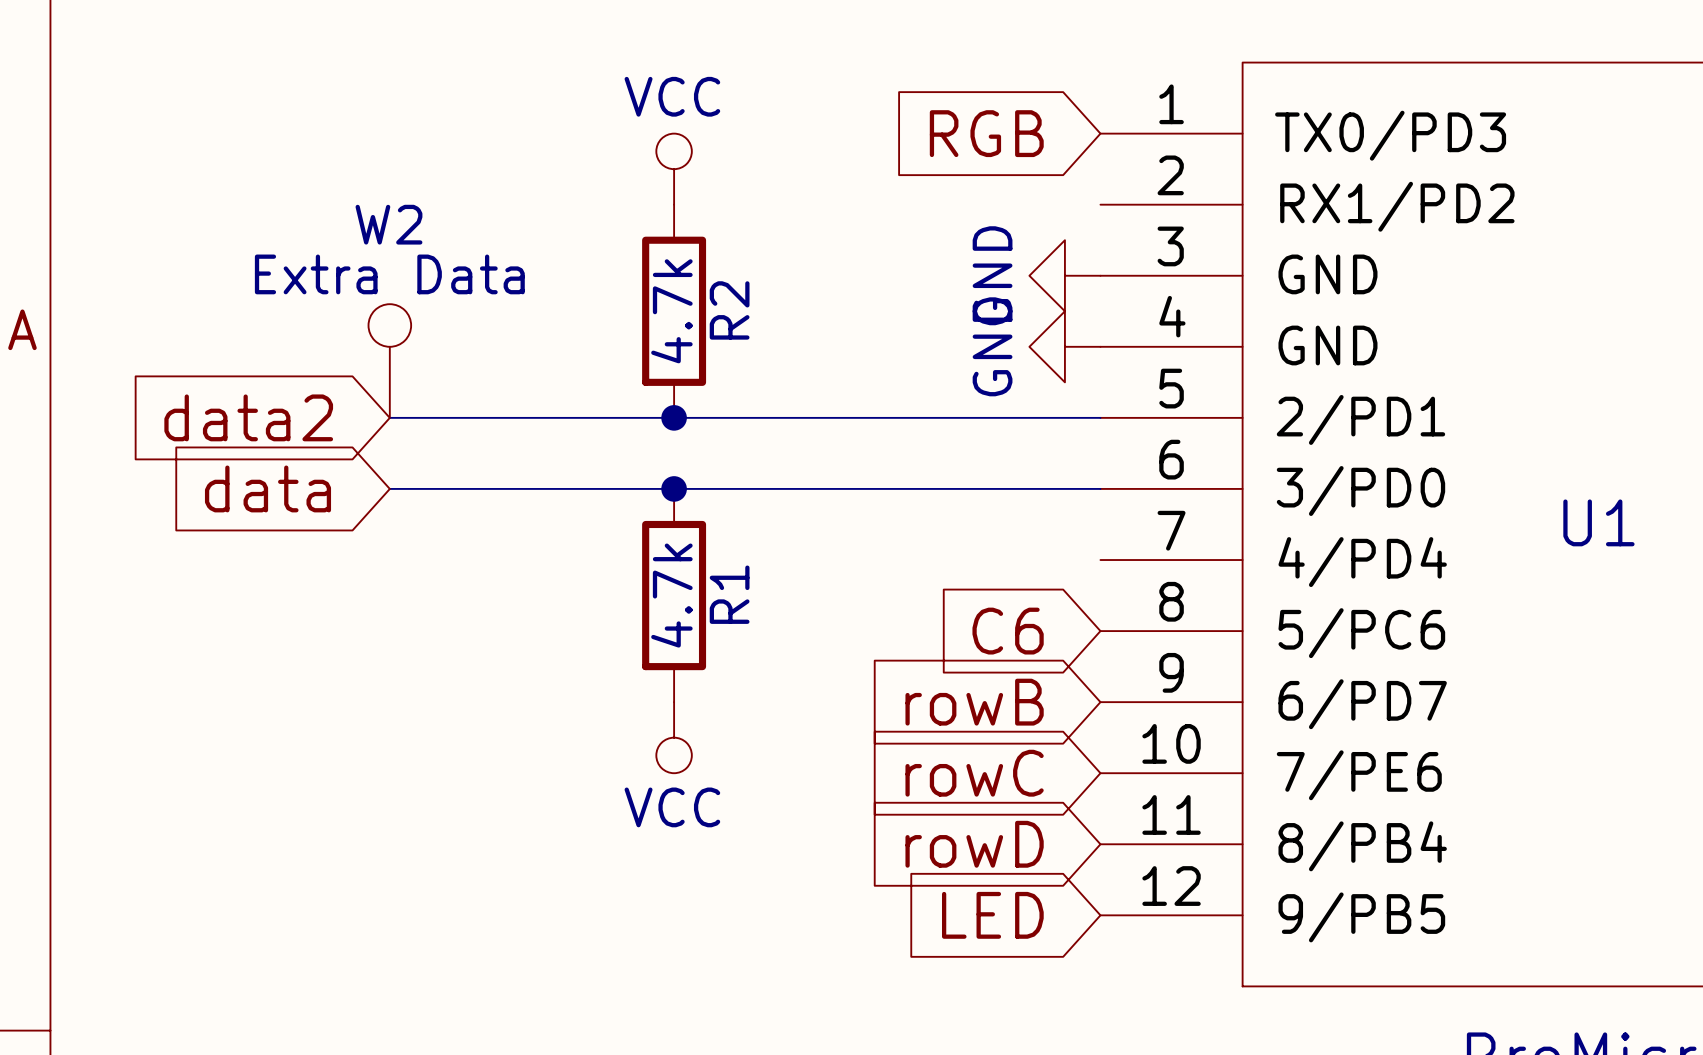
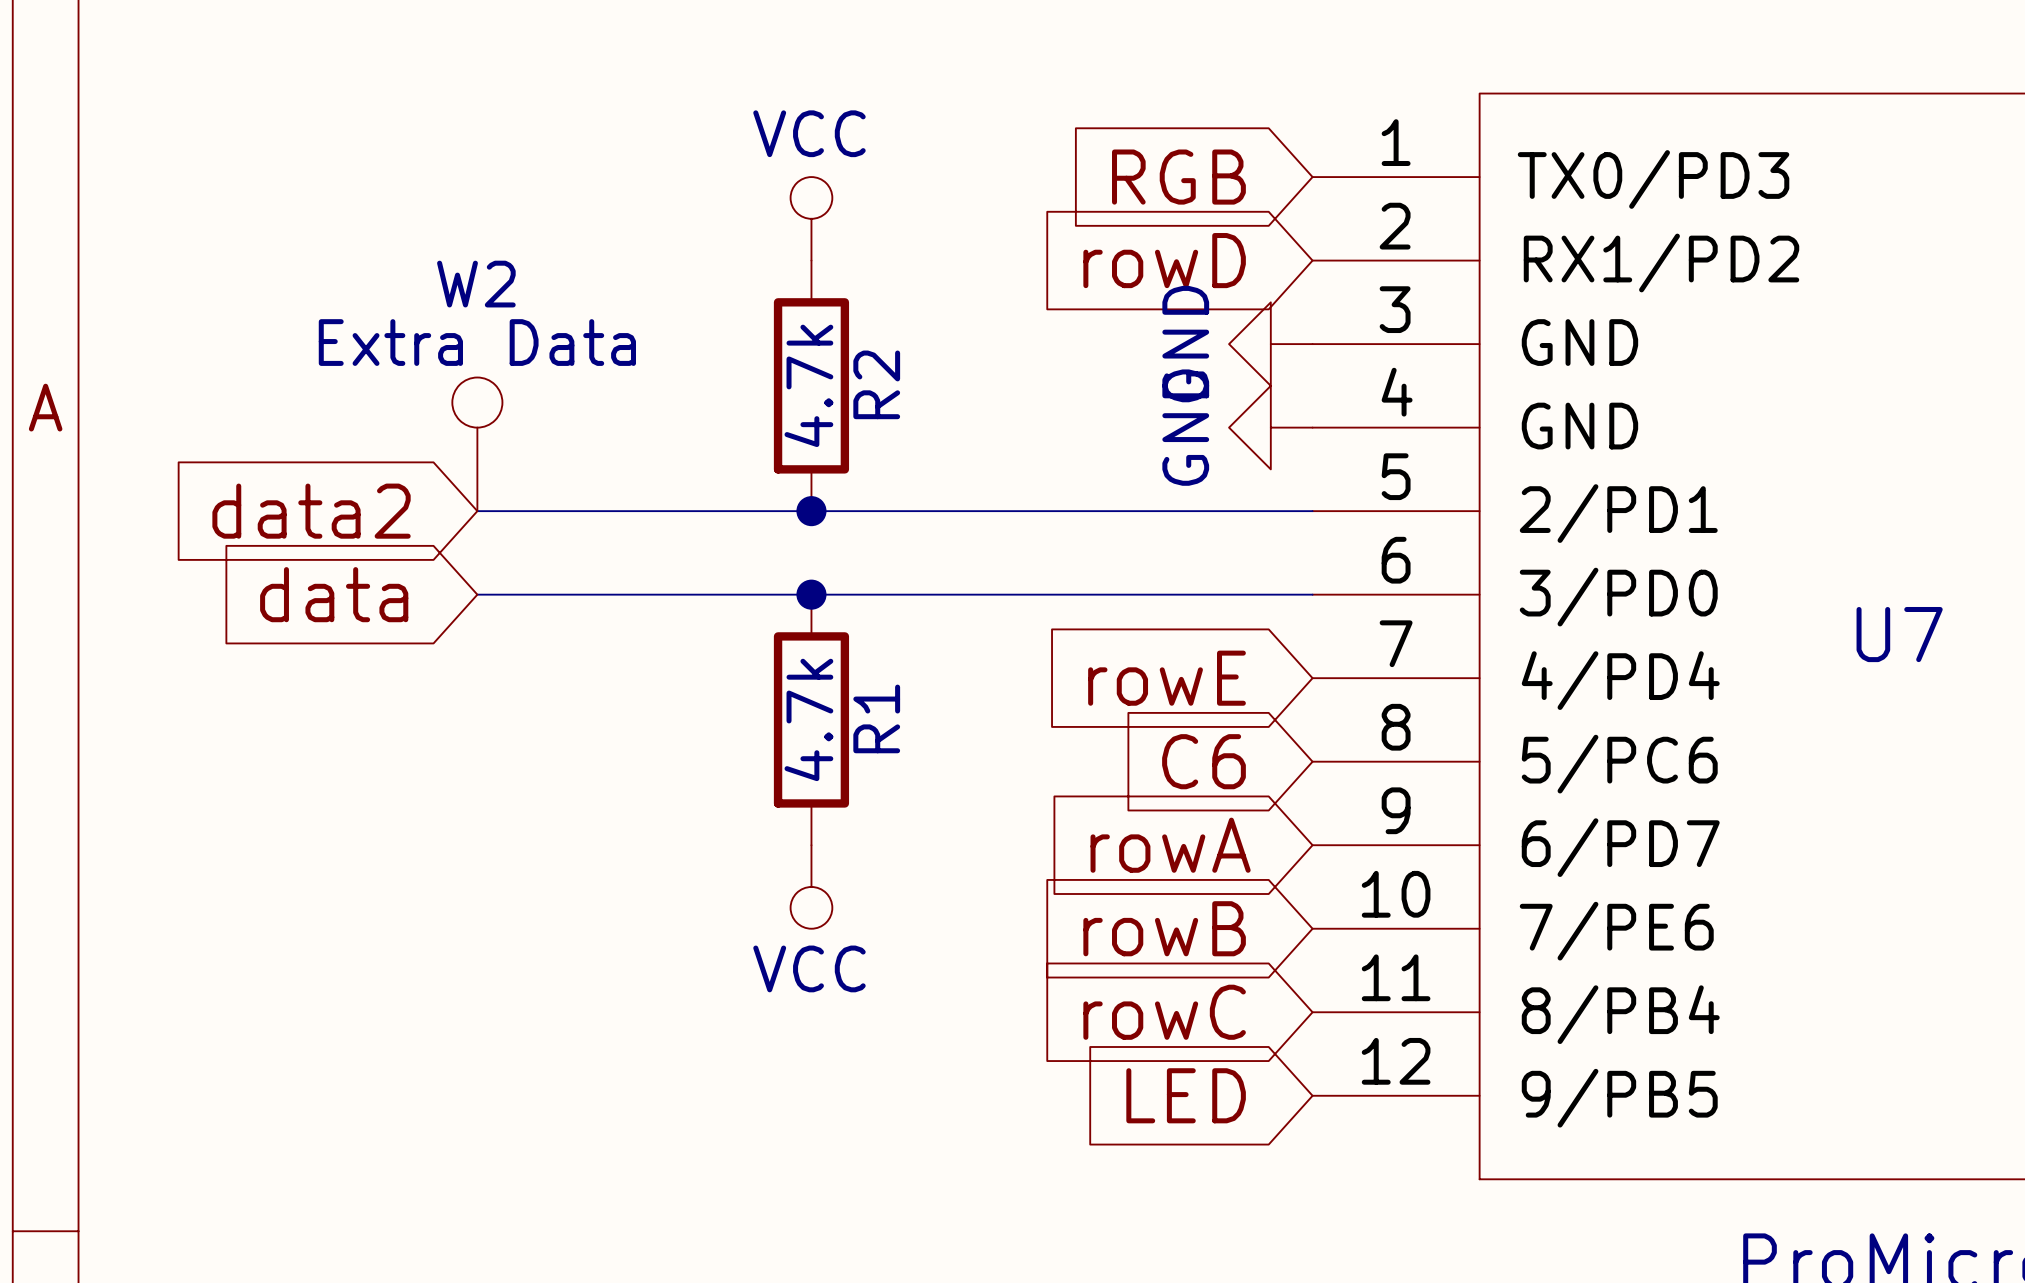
global label: none -> rowD (1164, 260)
U1 name: U1 (1598, 522) -> U7 (1899, 634)
global label: none -> rowE (1167, 678)
global label: rowB (974, 702) -> rowA (1170, 845)
global label: rowC (974, 773) -> rowB (1164, 928)
global label: rowD (974, 844) -> rowC (1164, 1012)

